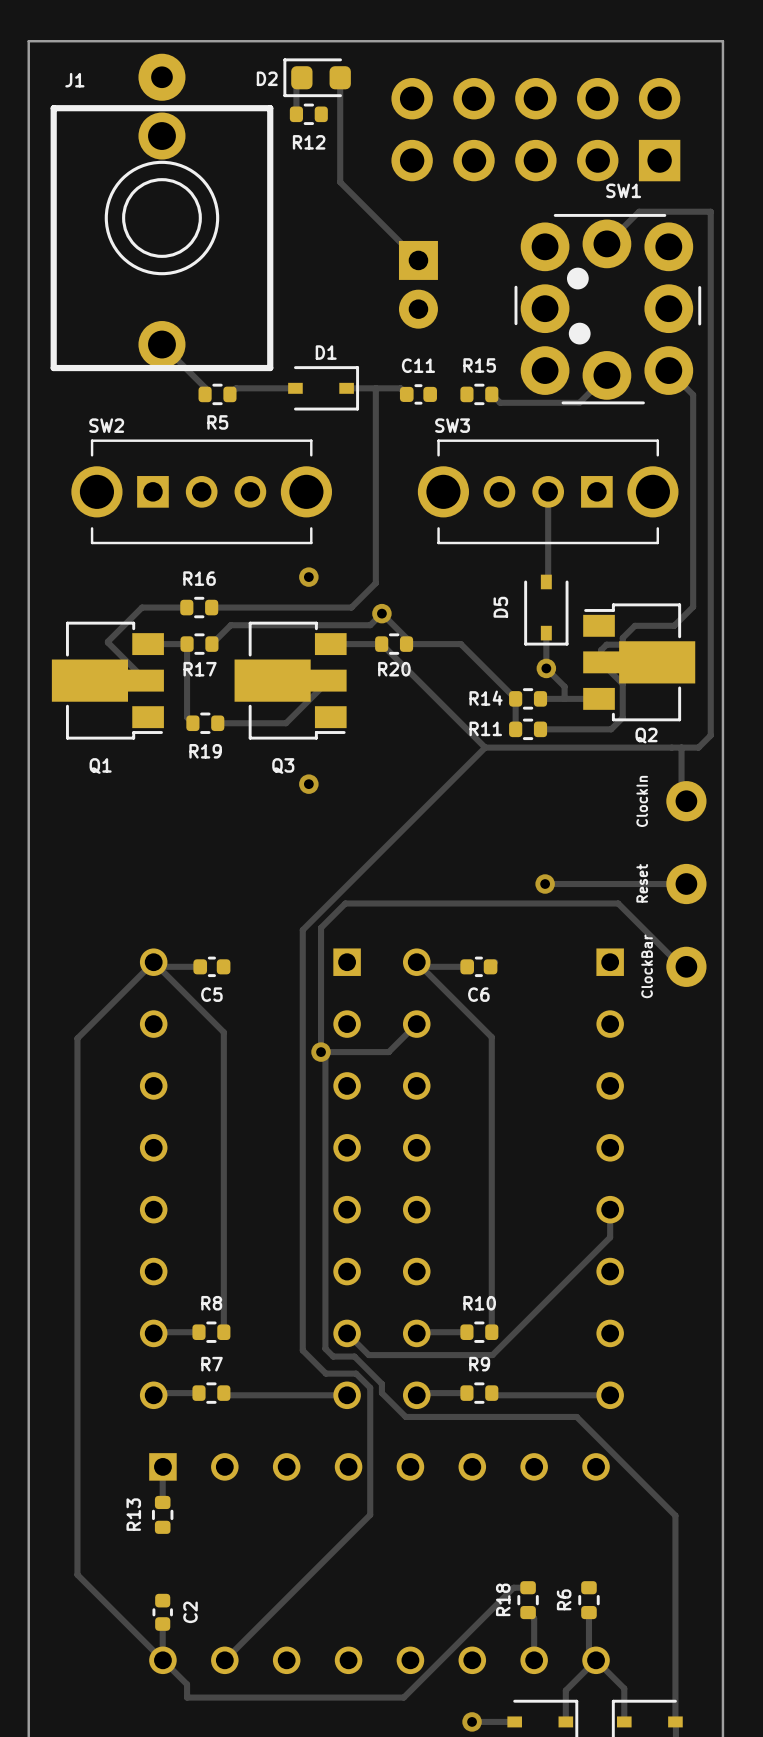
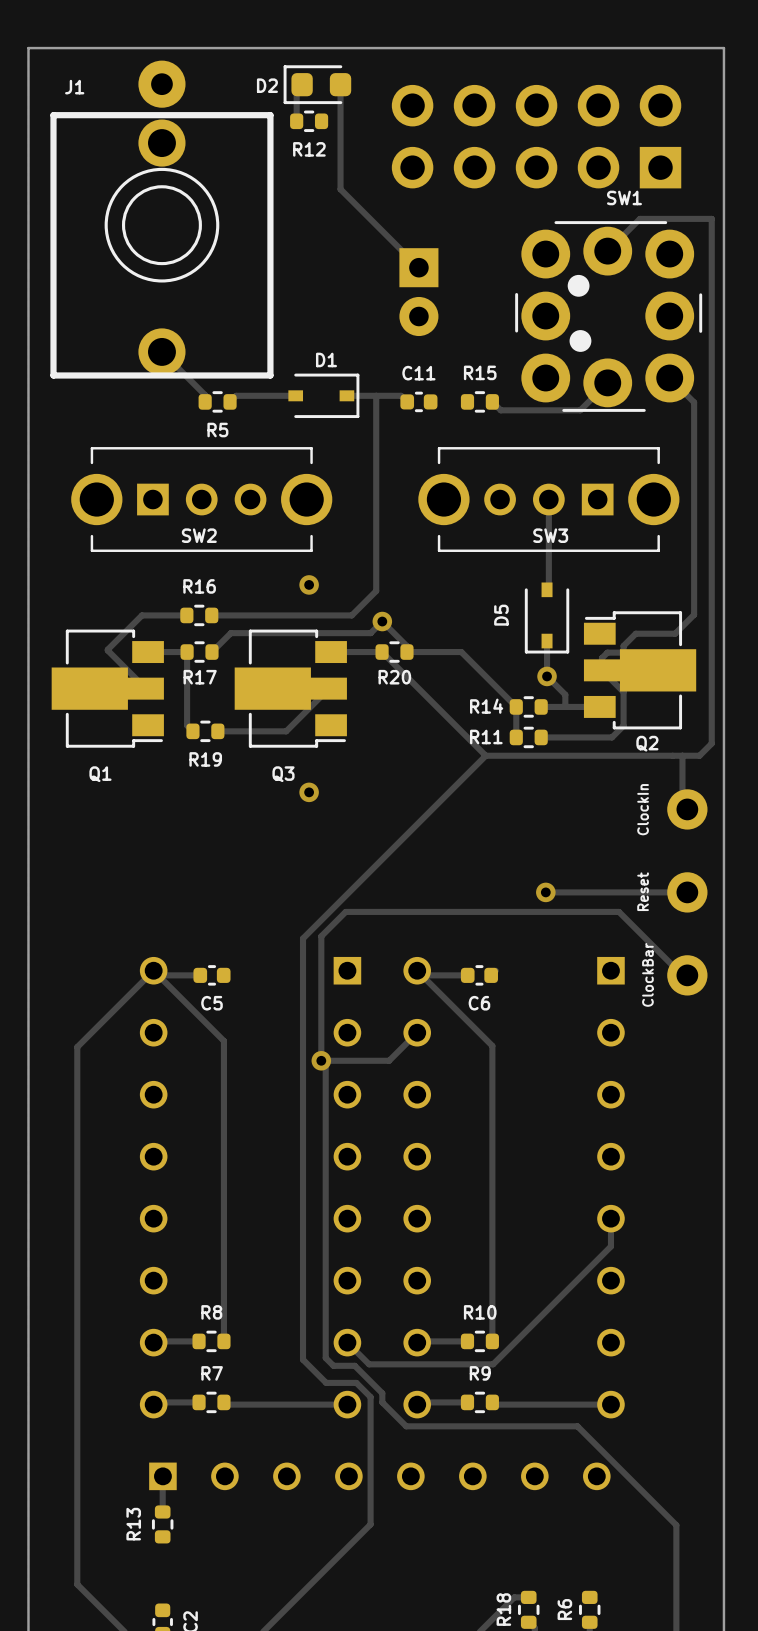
SW2 name position: SW2 (106, 425) -> SW2 (199, 535)
SW3 name position: SW3 (452, 425) -> SW3 (550, 535)

